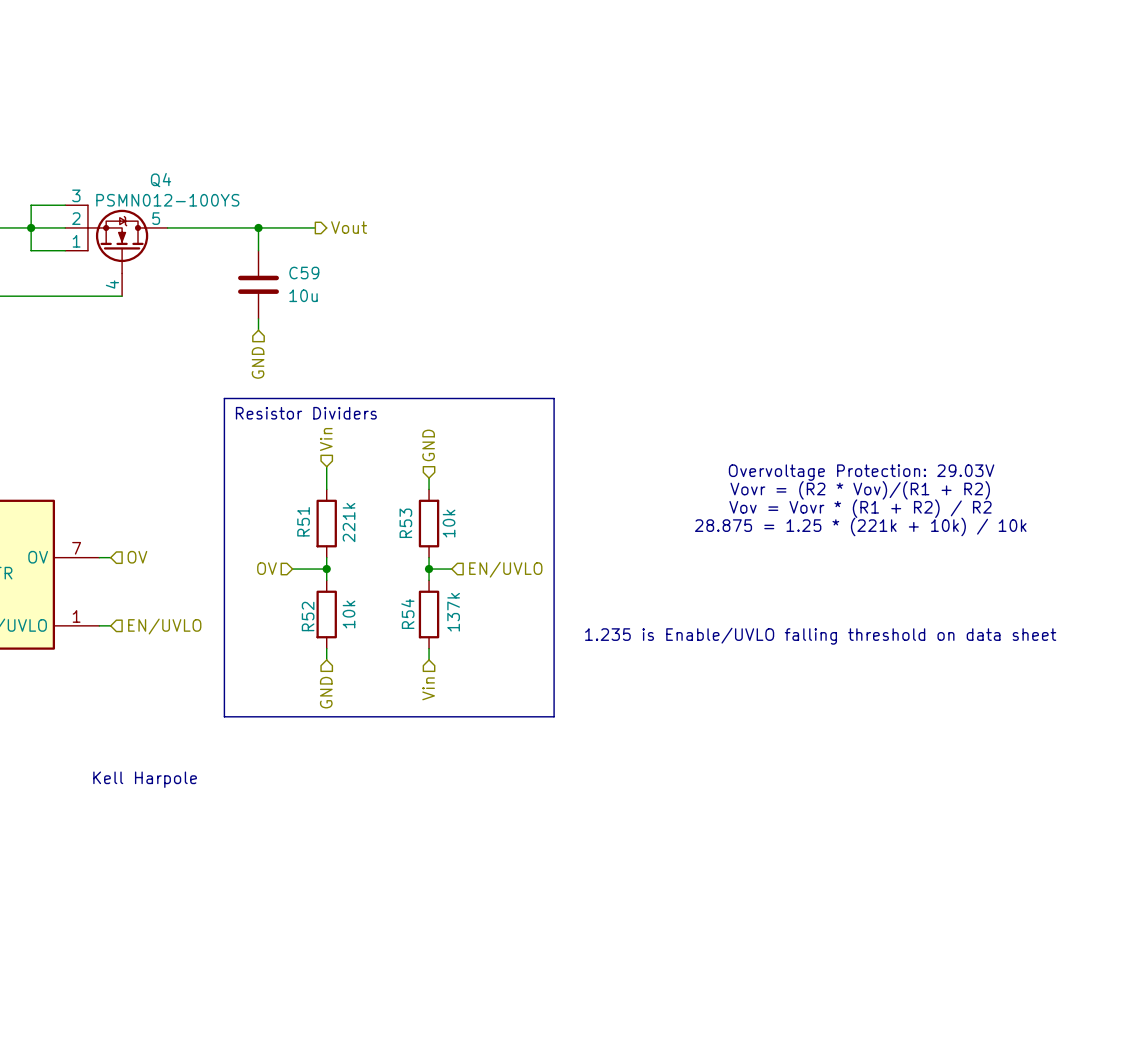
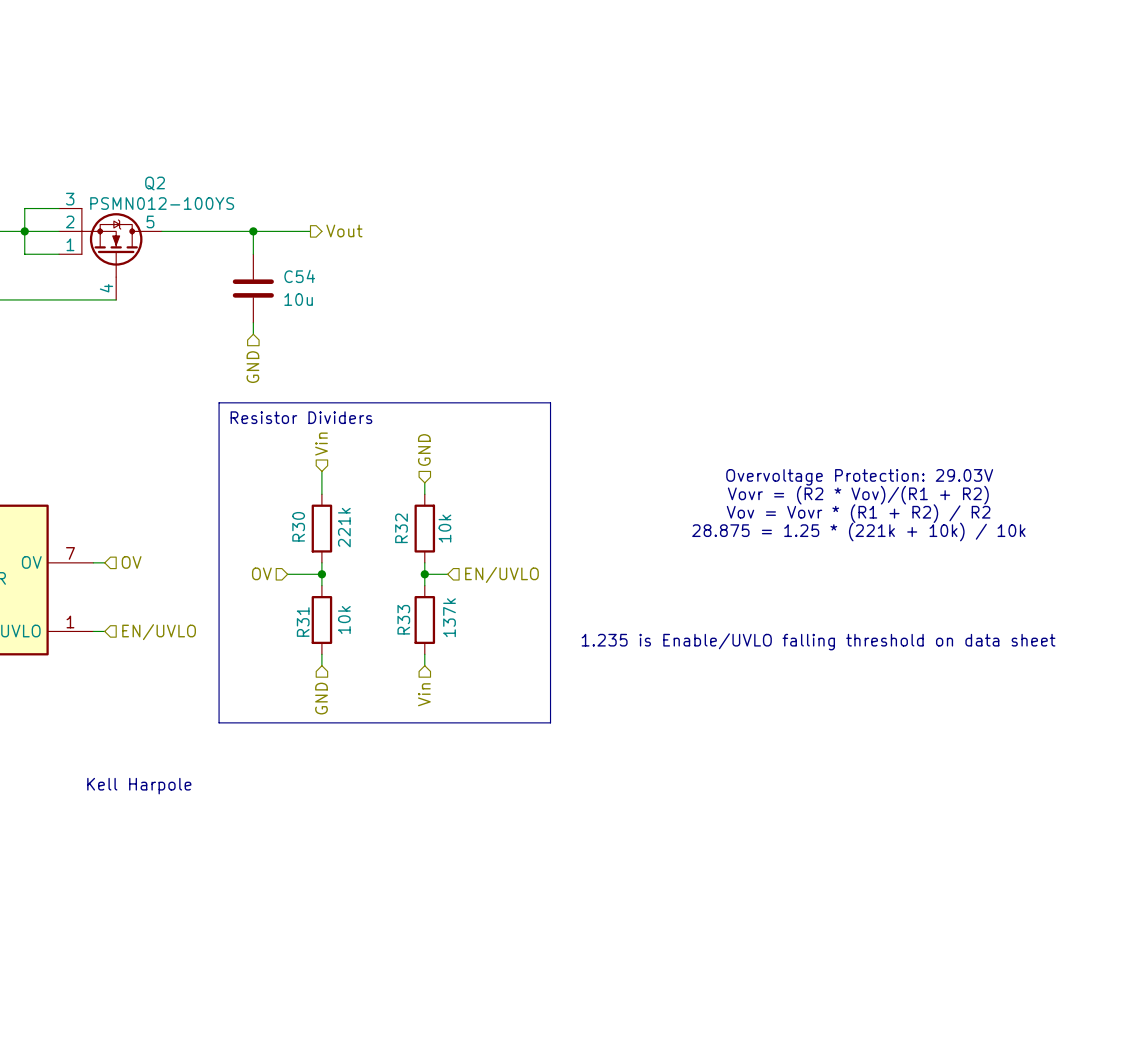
Q4 name: Q4 (161, 180) -> Q2 (155, 183)
C59 name: C59 (304, 273) -> C54 (299, 276)
R51 name: R51 (303, 521) -> R30 (298, 526)
R53 name: R53 (405, 523) -> R32 (401, 528)
R54 name: R54 (407, 613) -> R33 (403, 619)
R52 name: R52 (308, 616) -> R31 (303, 622)

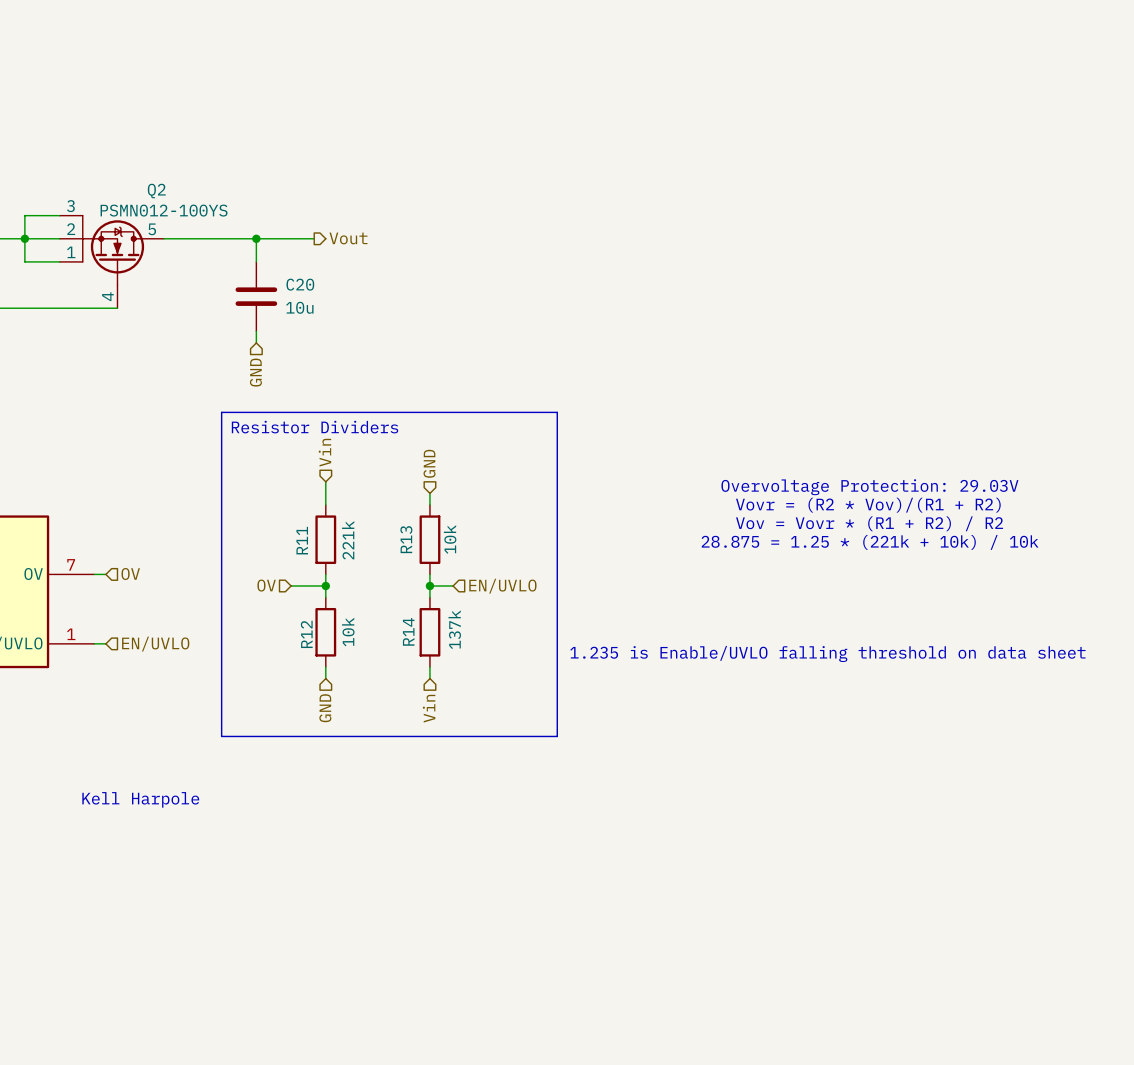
C54 name: C54 (299, 276) -> C20 (300, 284)
R30 name: R30 (298, 526) -> R11 (302, 540)
R32 name: R32 (401, 528) -> R13 (406, 539)
R33 name: R33 (403, 619) -> R14 (408, 631)
R31 name: R31 (303, 622) -> R12 (306, 634)

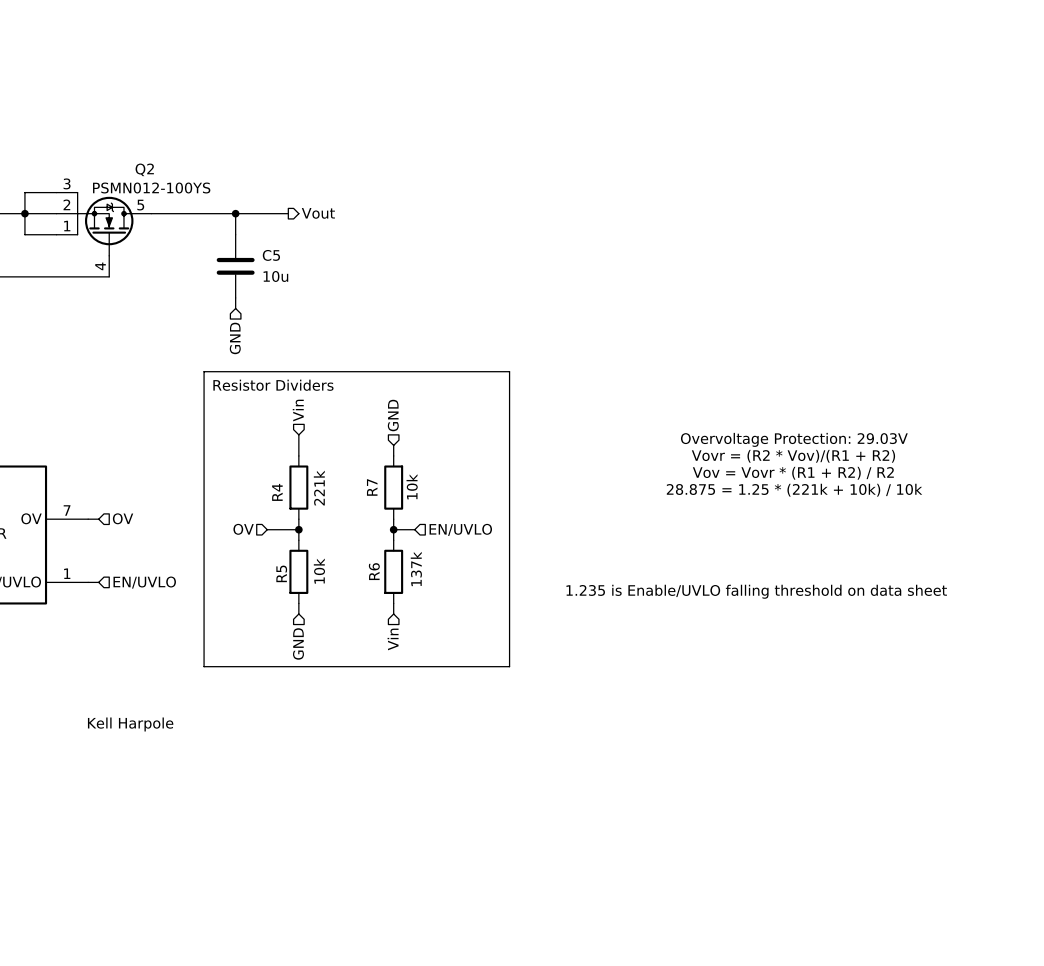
C20 name: C20 (300, 284) -> C5 (271, 255)
R13 name: R13 (406, 539) -> R7 (372, 487)
R11 name: R11 (302, 540) -> R4 (277, 492)
R14 name: R14 (408, 631) -> R6 (374, 571)
R12 name: R12 (306, 634) -> R5 (281, 573)

